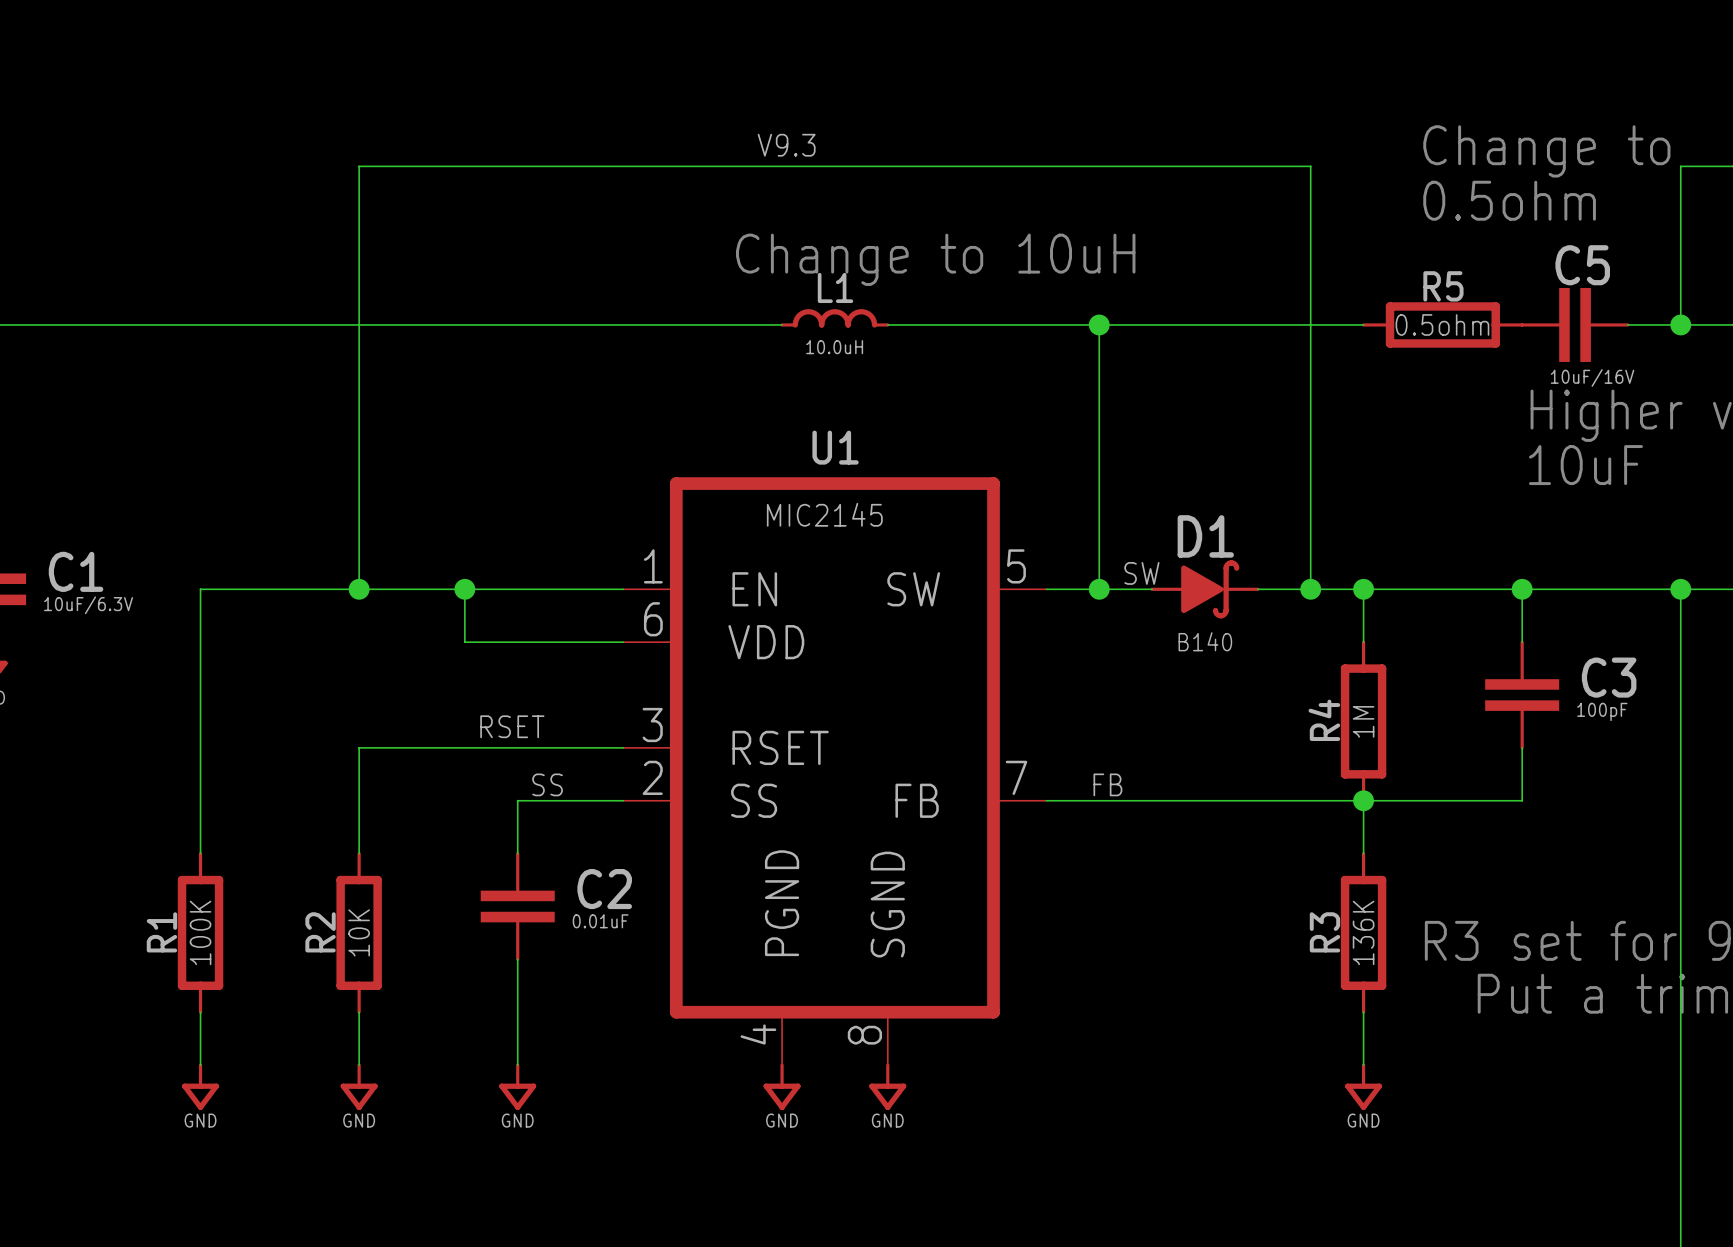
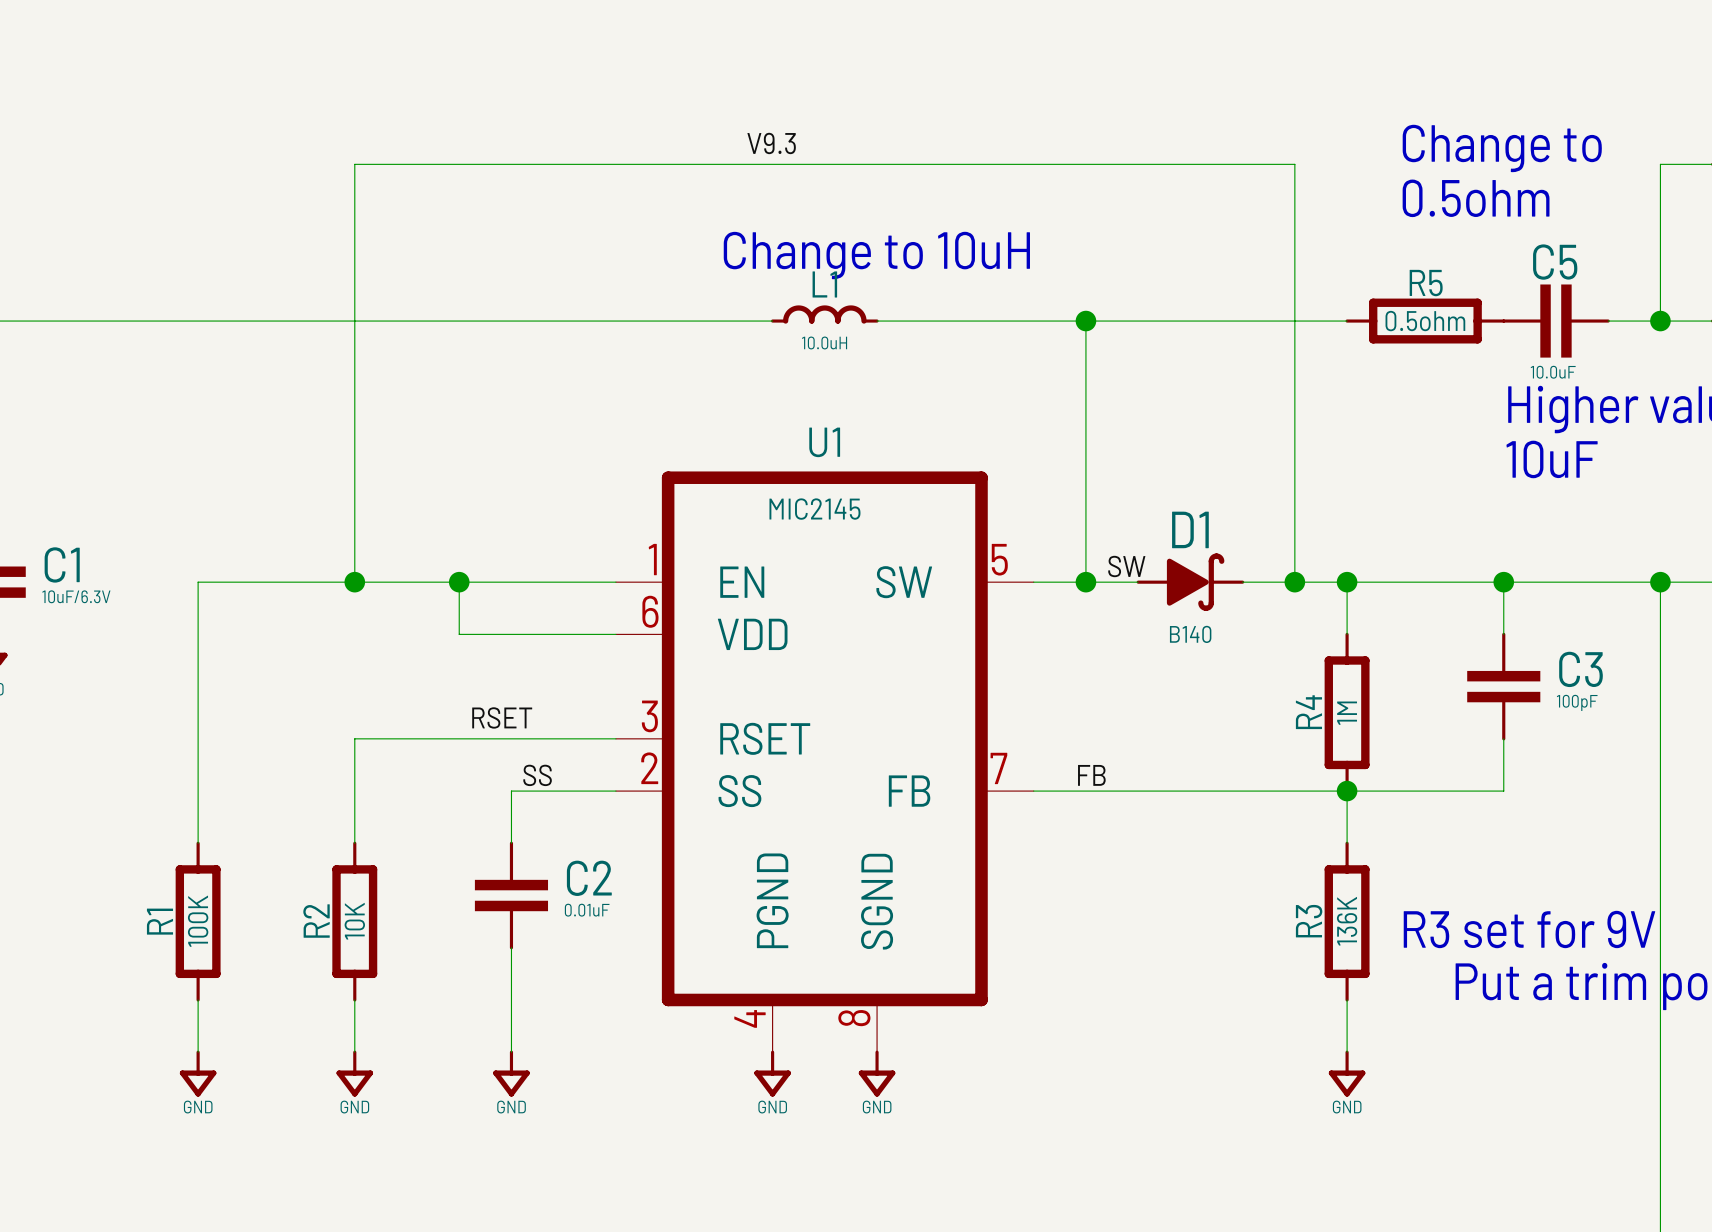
C5 value: 10uF/16V (1592, 377) -> 10.0uF (1553, 372)

